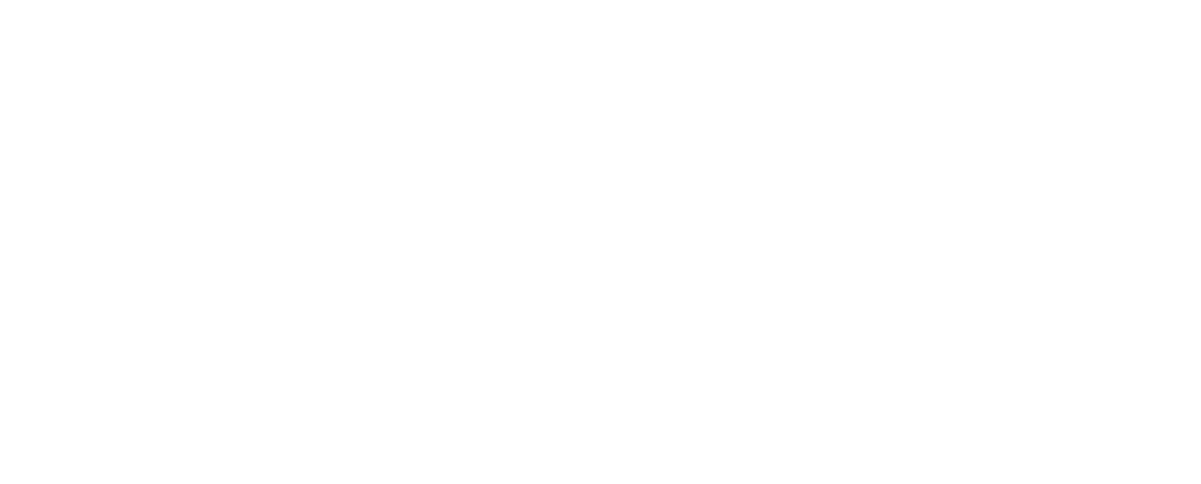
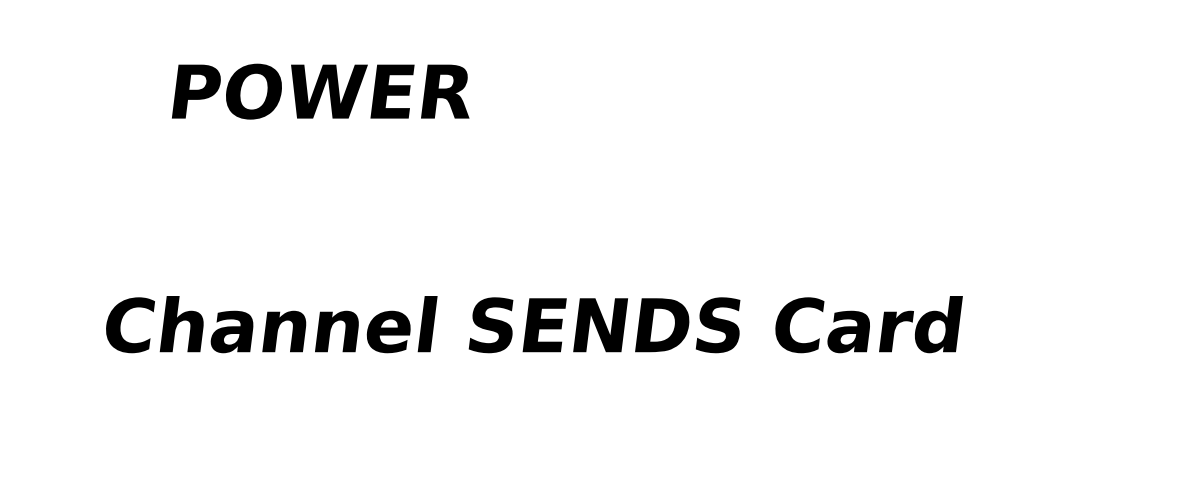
text: none -> POWER (320, 91)
text: none -> Channel SENDS Card (533, 324)

